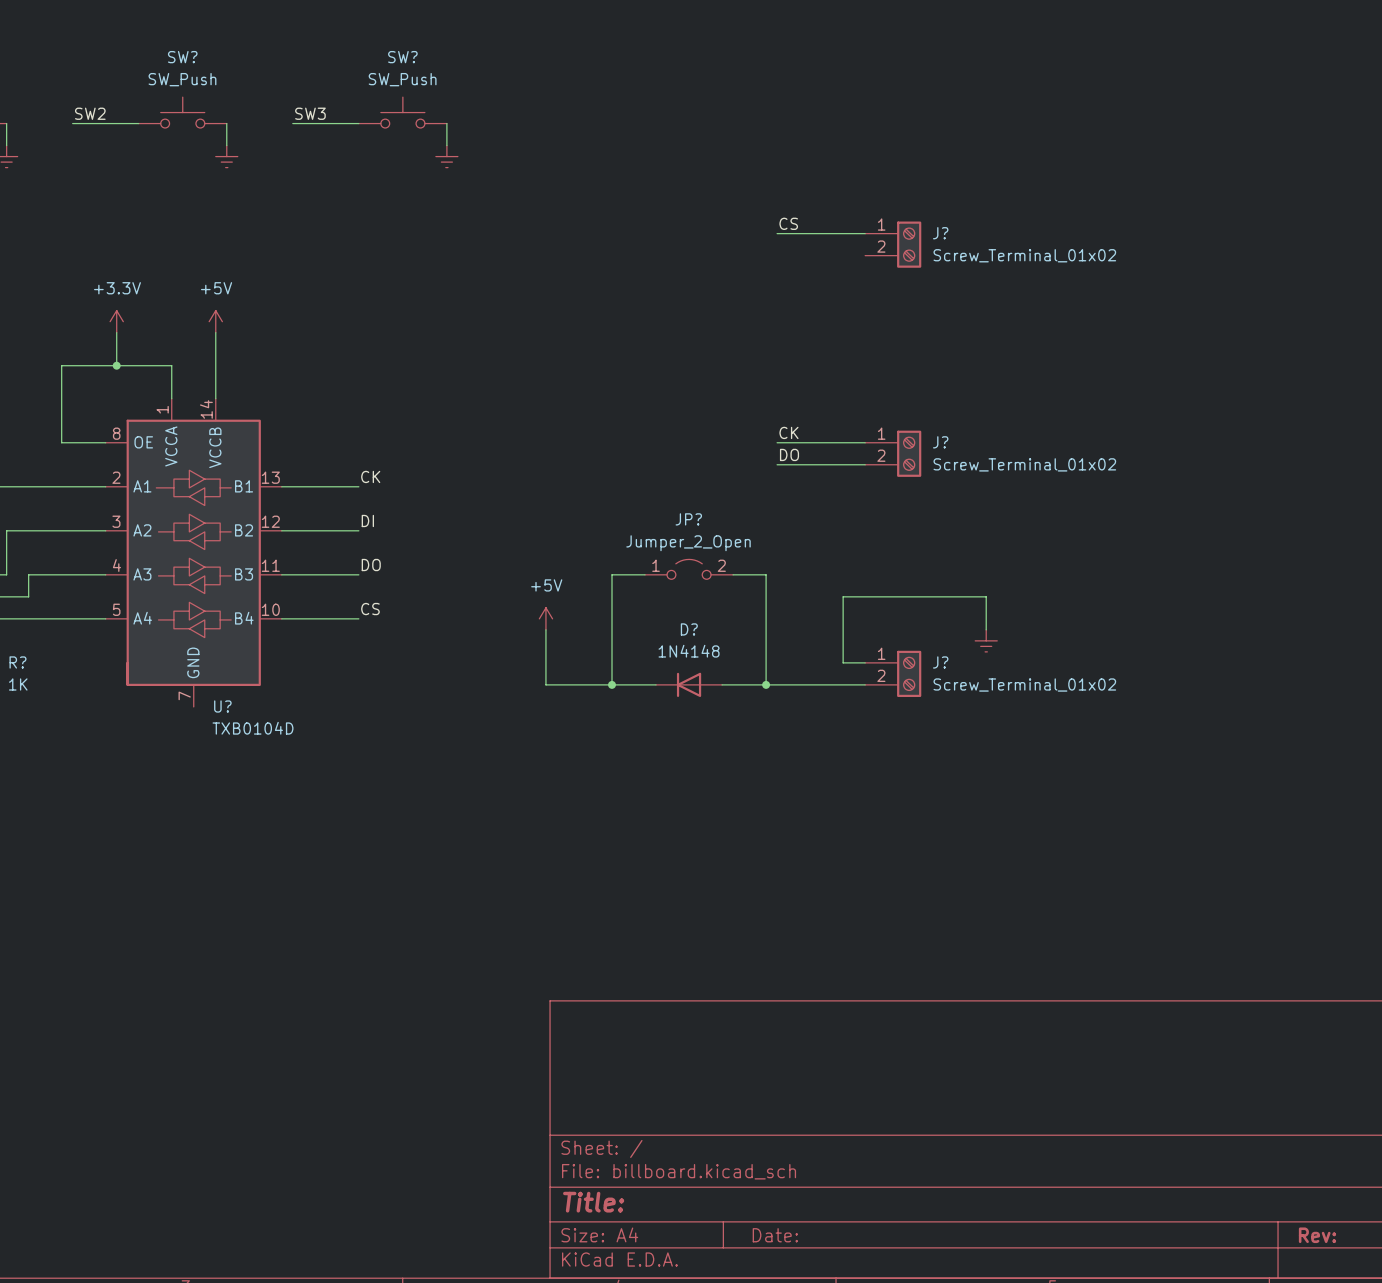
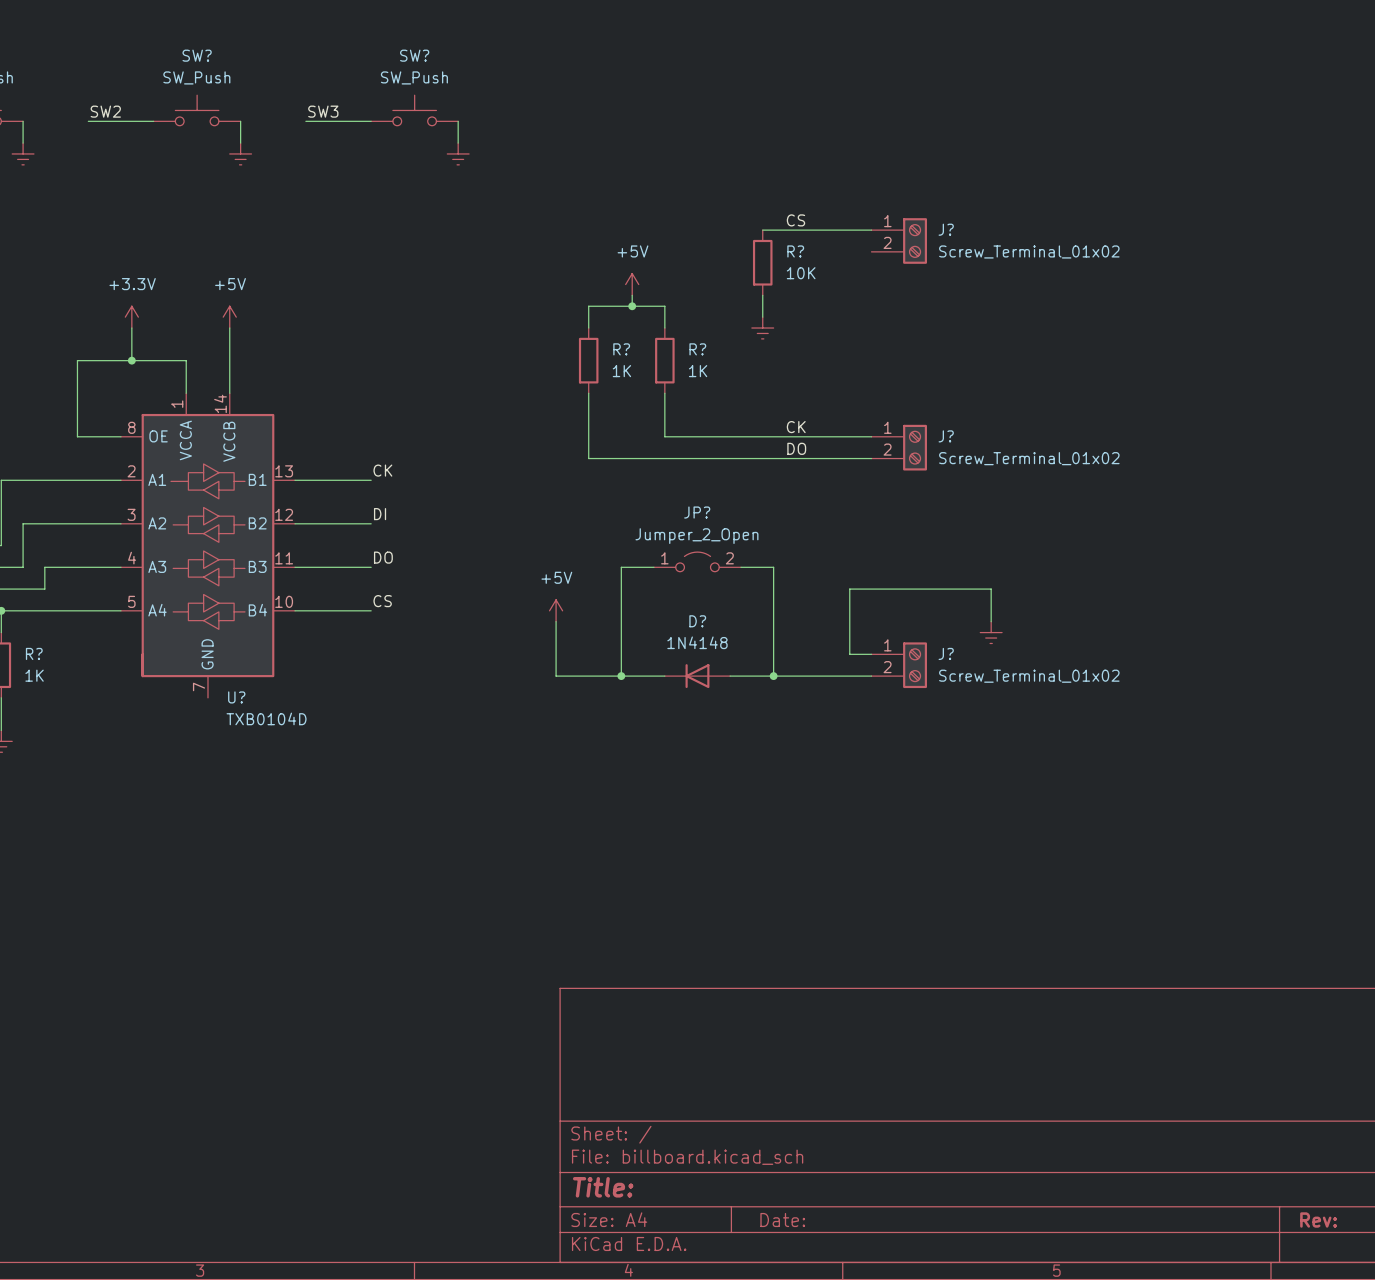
wire: none -> (762, 230) (784, 230)
R?: none -> 10K (762, 262)
power symbol: none -> +5V (632, 284)
wire: none -> (632, 295) (632, 306)
wire: none -> (762, 295) (762, 317)
junction: none -> (632, 306)
wire: none -> (588, 328) (588, 306) (664, 306) (664, 328)
power symbol: none -> (762, 328)
R?: none -> 1K (588, 360)
R?: none -> 1K (664, 360)
wire: none -> (588, 393) (588, 458) (784, 458)
wire: none -> (664, 393) (664, 436) (784, 436)

